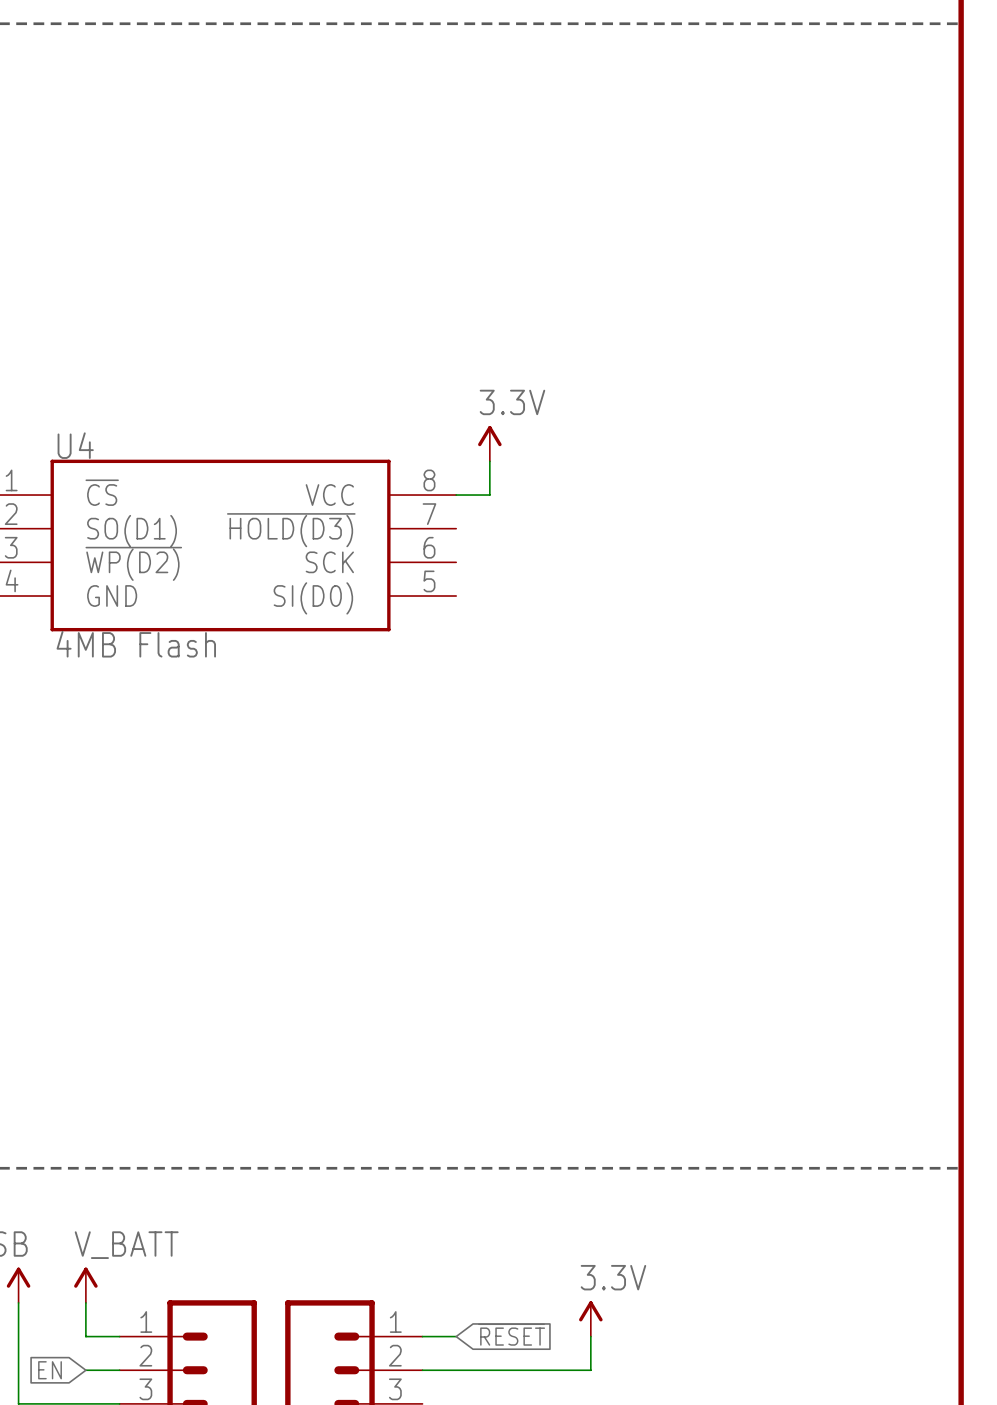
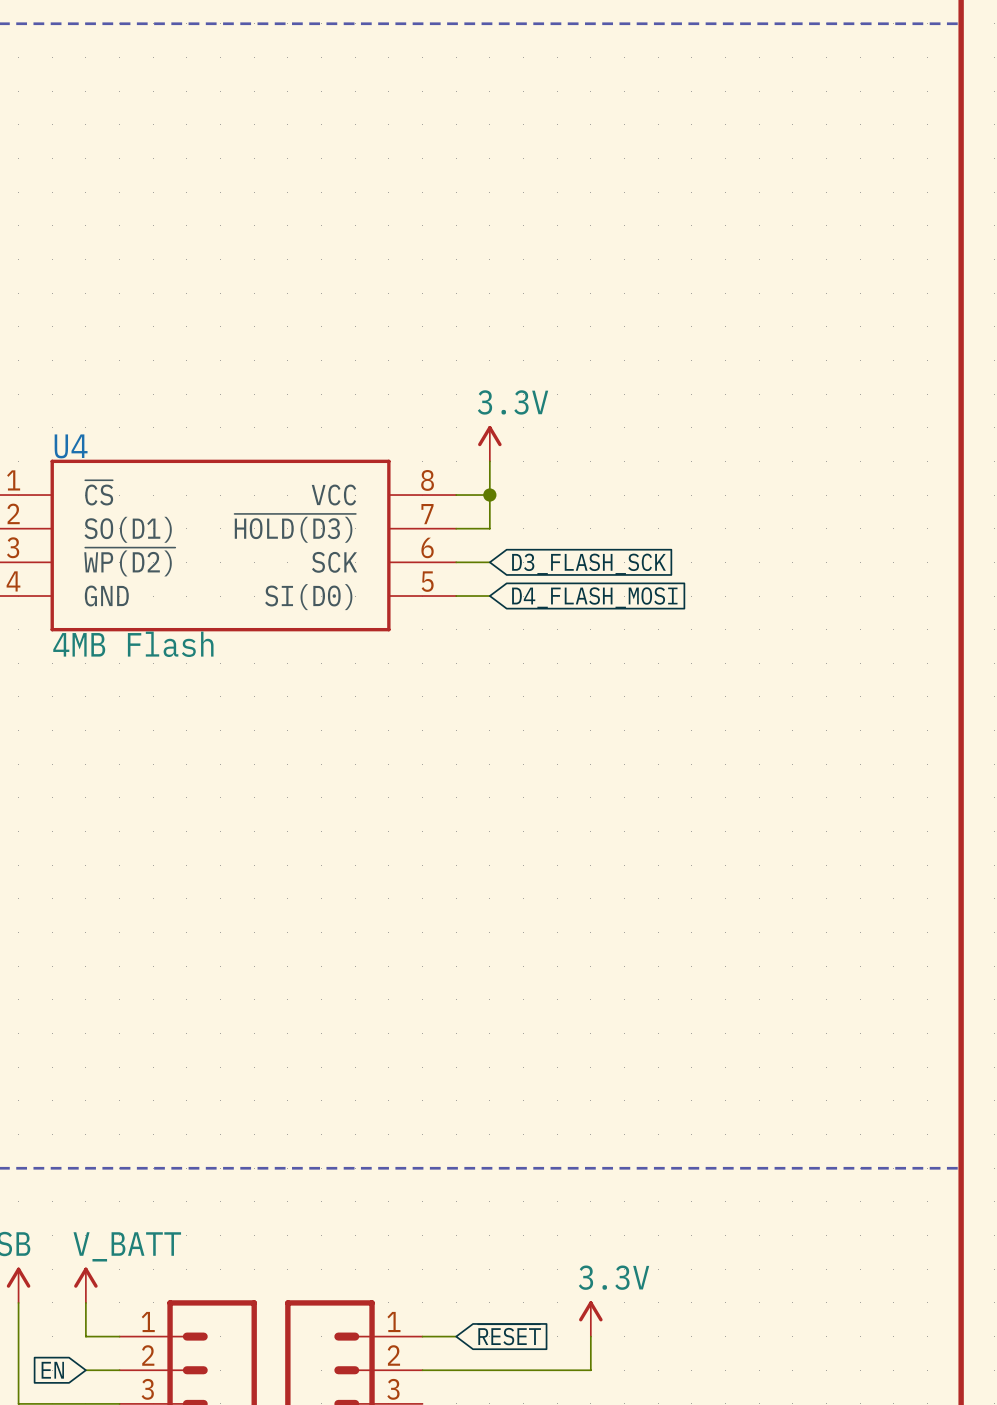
wire: none -> (489, 495) (489, 528) (456, 528)
junction: none -> (489, 495)
wire: none -> (456, 562) (489, 562)
global label: none -> D3_FLASH_SCK (588, 564)
wire: none -> (456, 596) (489, 596)
global label: none -> D4_FLASH_MOSI (594, 597)

